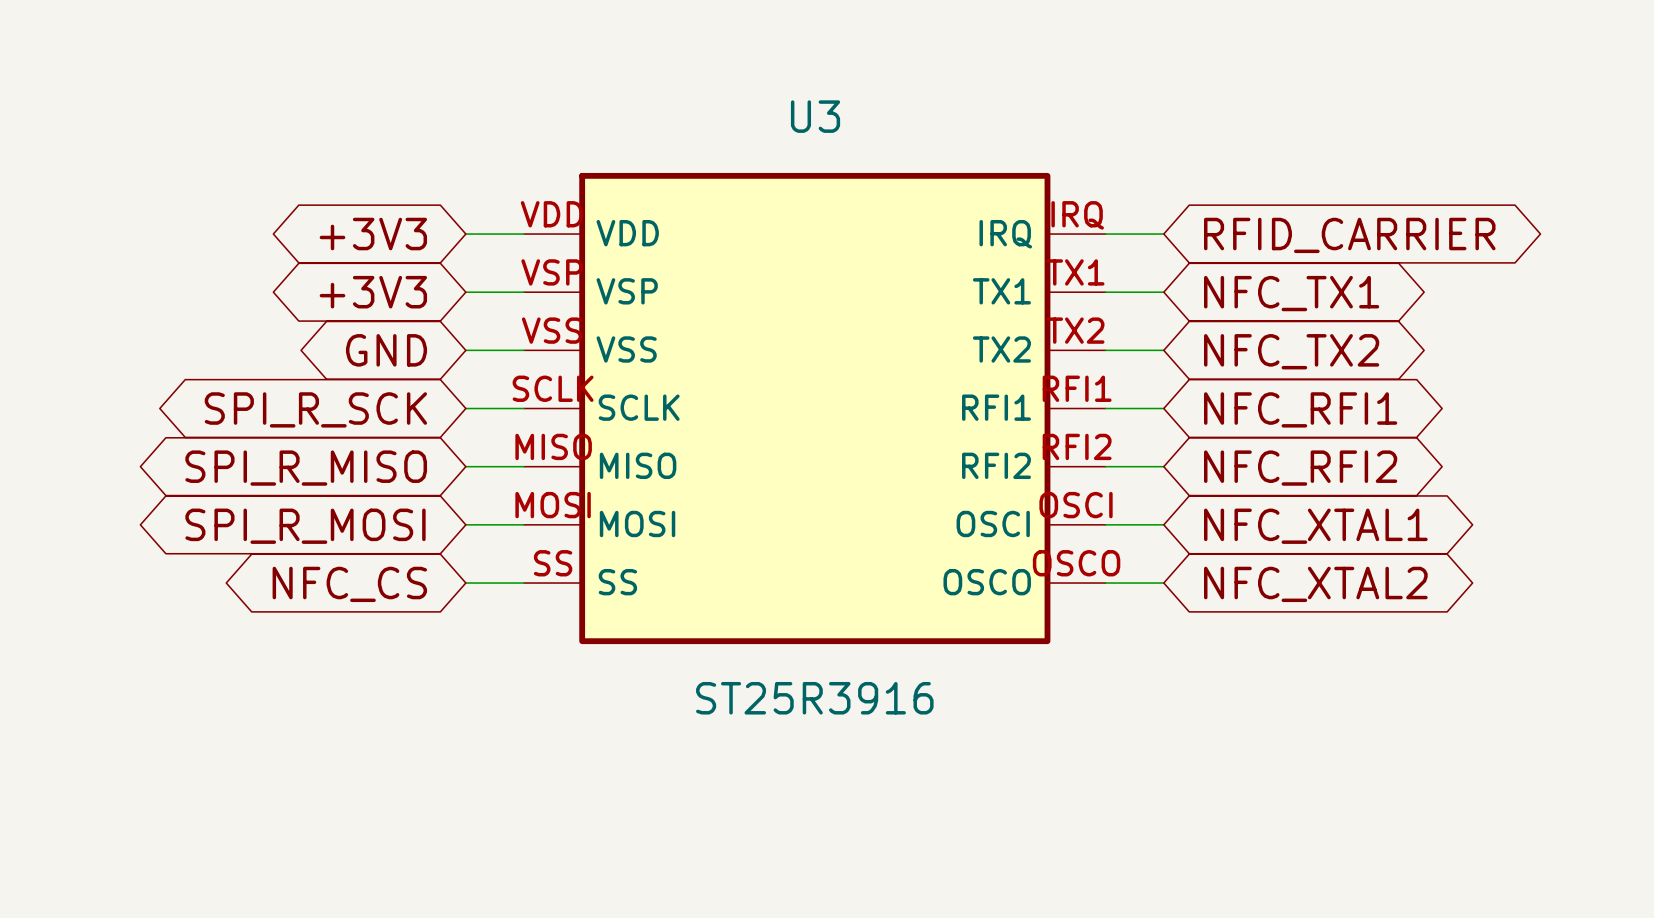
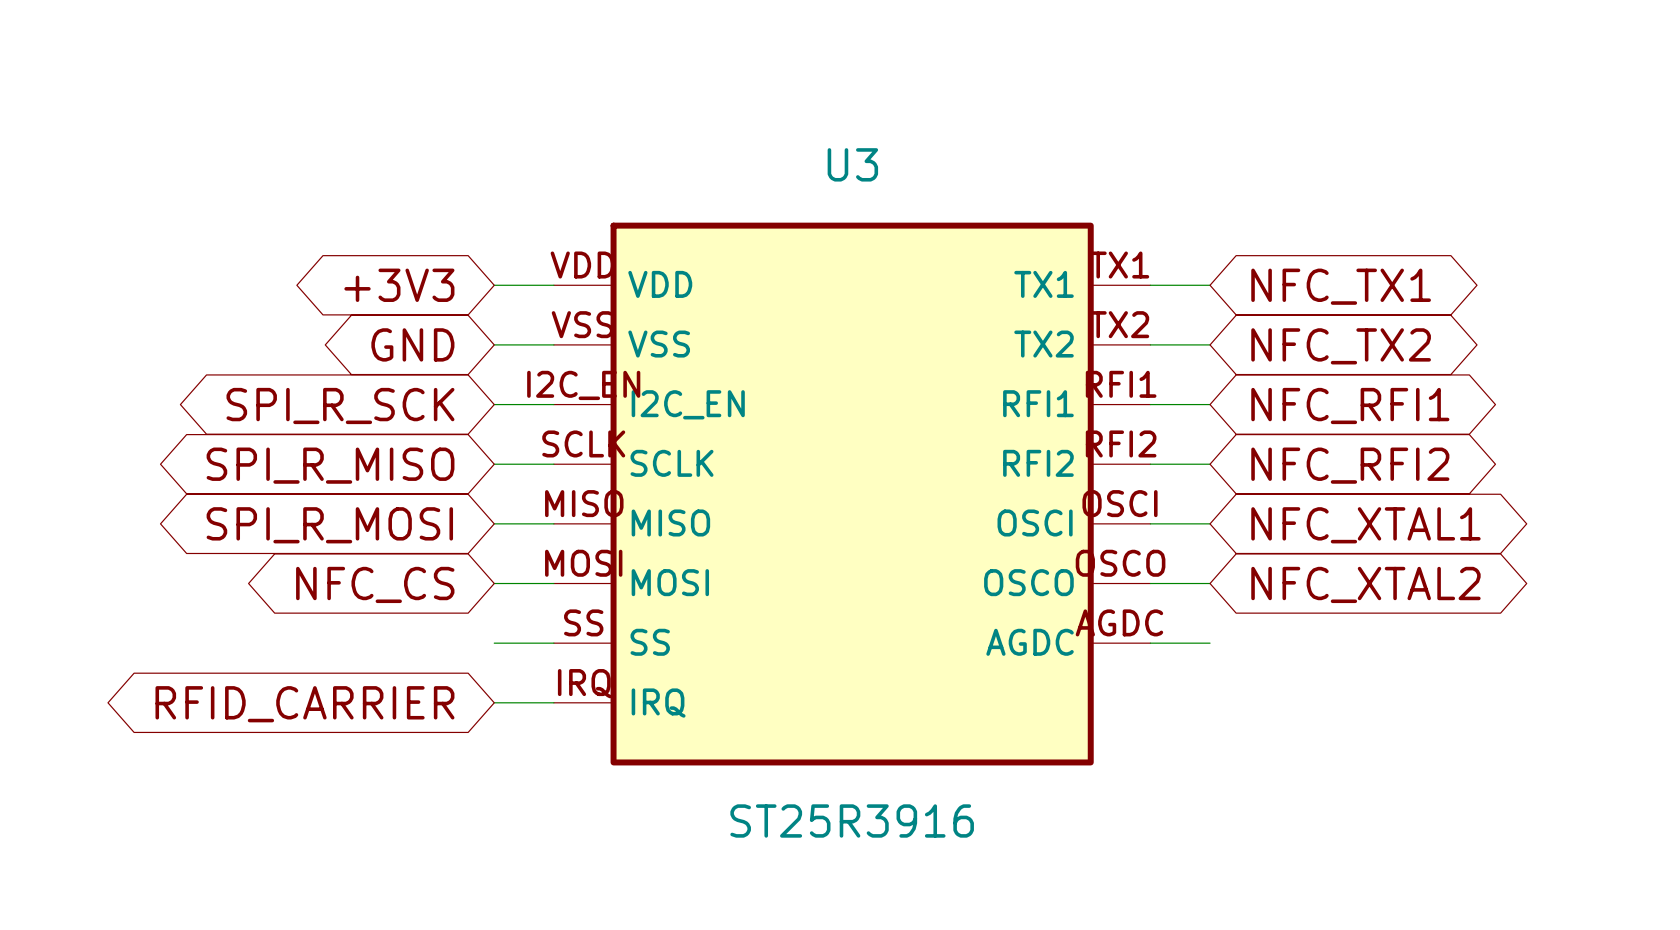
U3 symbol: [524, 172, 1106, 645] -> [553, 222, 1151, 766]
global label: +3V3 (373, 234) -> none
wire: (465, 234) (524, 234) -> (494, 643) (553, 643)
wire: (1105, 234) (1163, 234) -> (1150, 643) (1210, 643)
global label: RFID_CARRIER (1349, 235) -> none
wire: none -> (494, 702) (553, 702)
global label: none -> RFID_CARRIER (304, 704)

